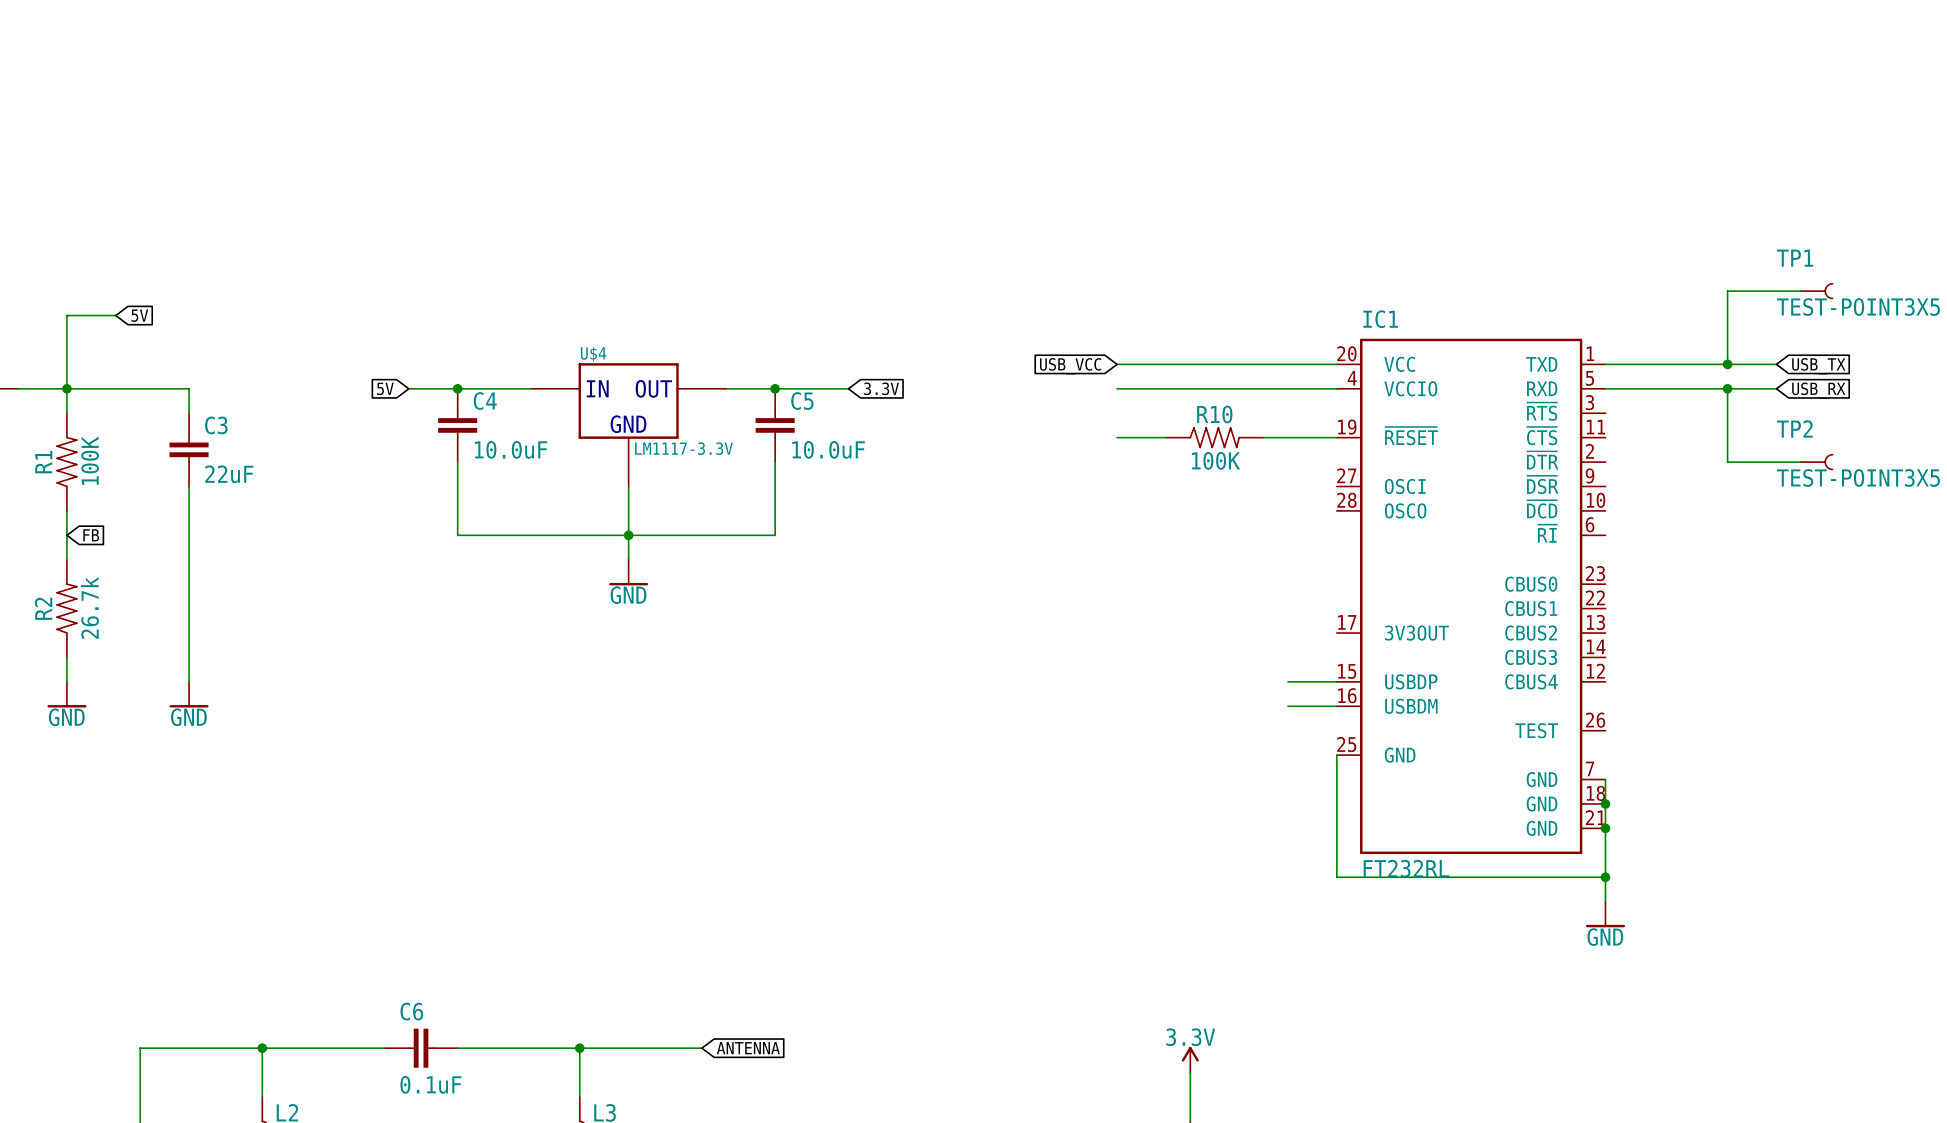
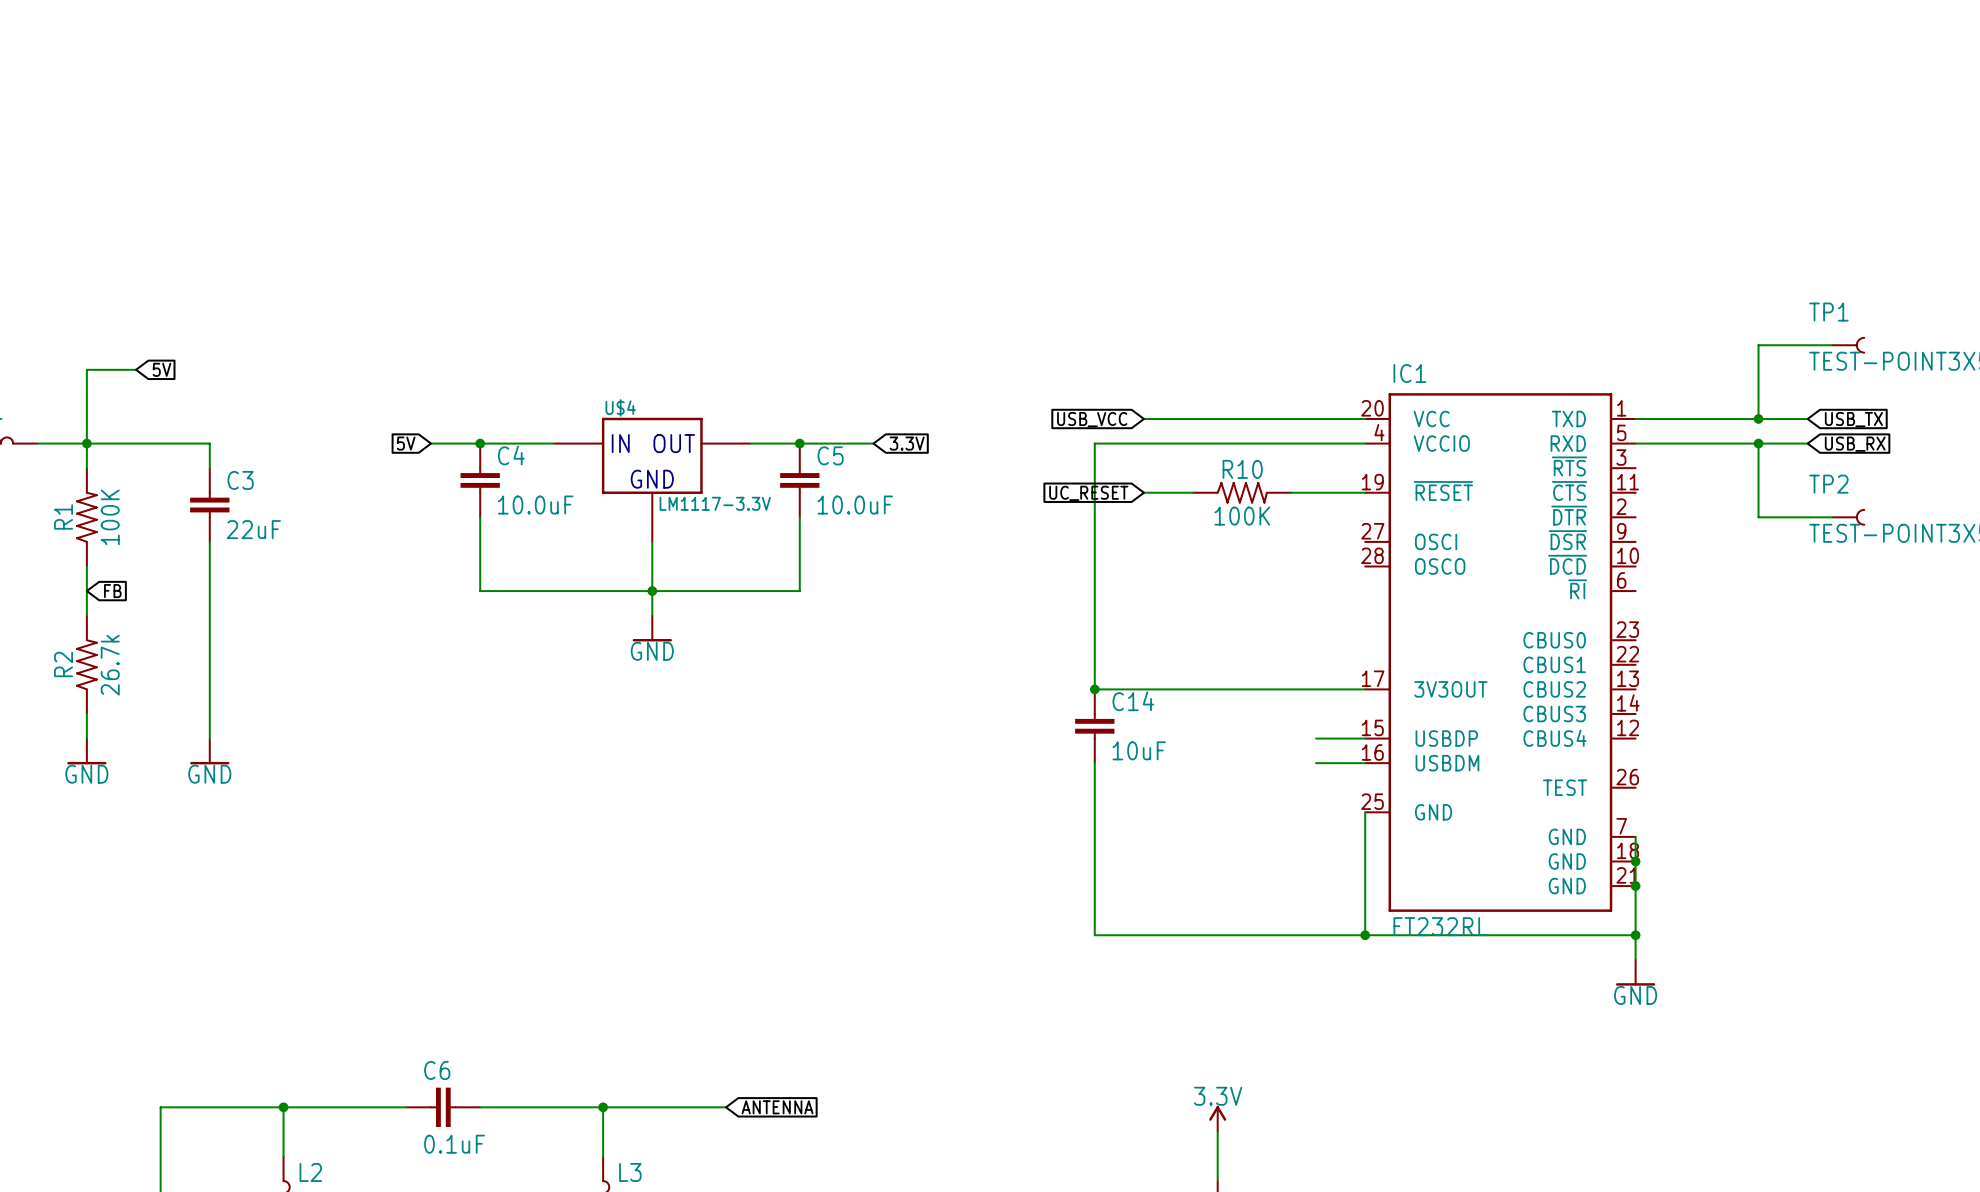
wire: none -> (1143, 443) (1094, 443) (1094, 689) (1365, 689)
global label: none -> UC_RESET (1088, 493)
junction: none -> (1094, 689)
C14: none -> 10uF (1094, 726)
wire: none -> (1094, 763) (1094, 935) (1365, 935)
junction: none -> (1365, 935)

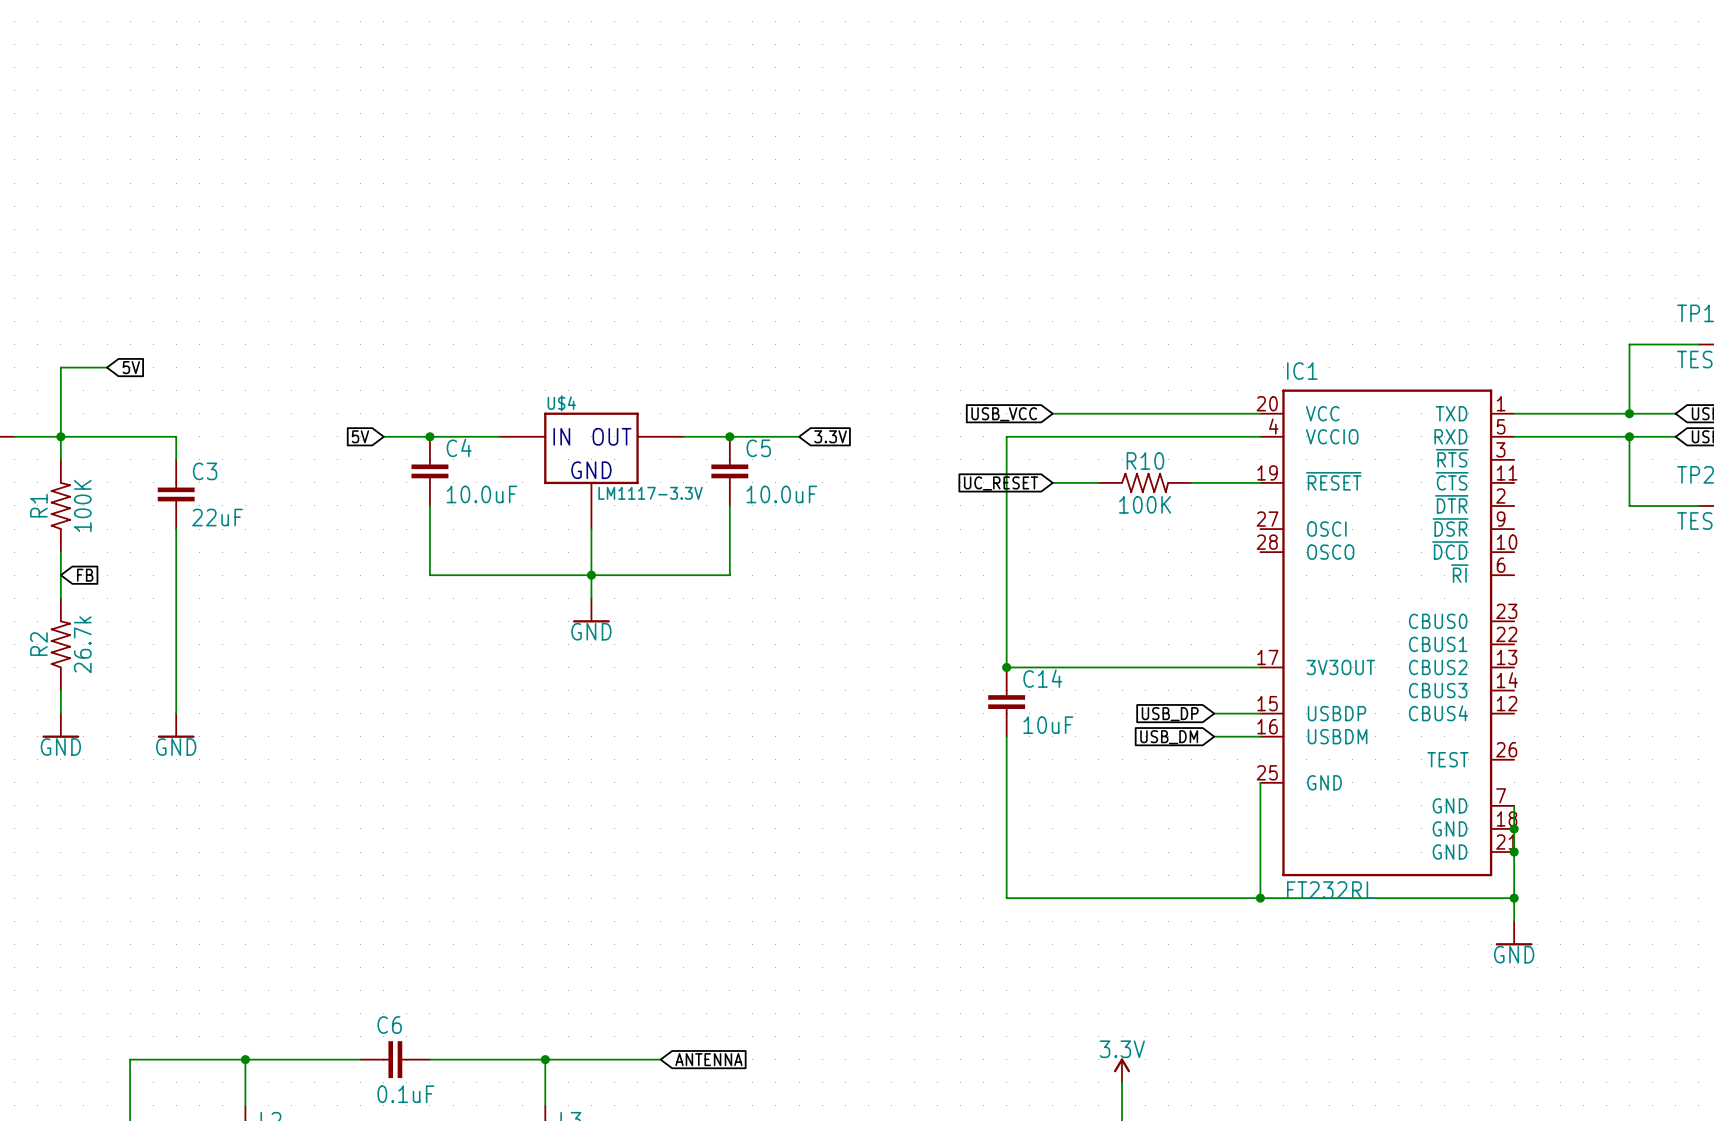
global label: none -> USB_DP (1170, 714)
global label: none -> USB_DM (1169, 737)

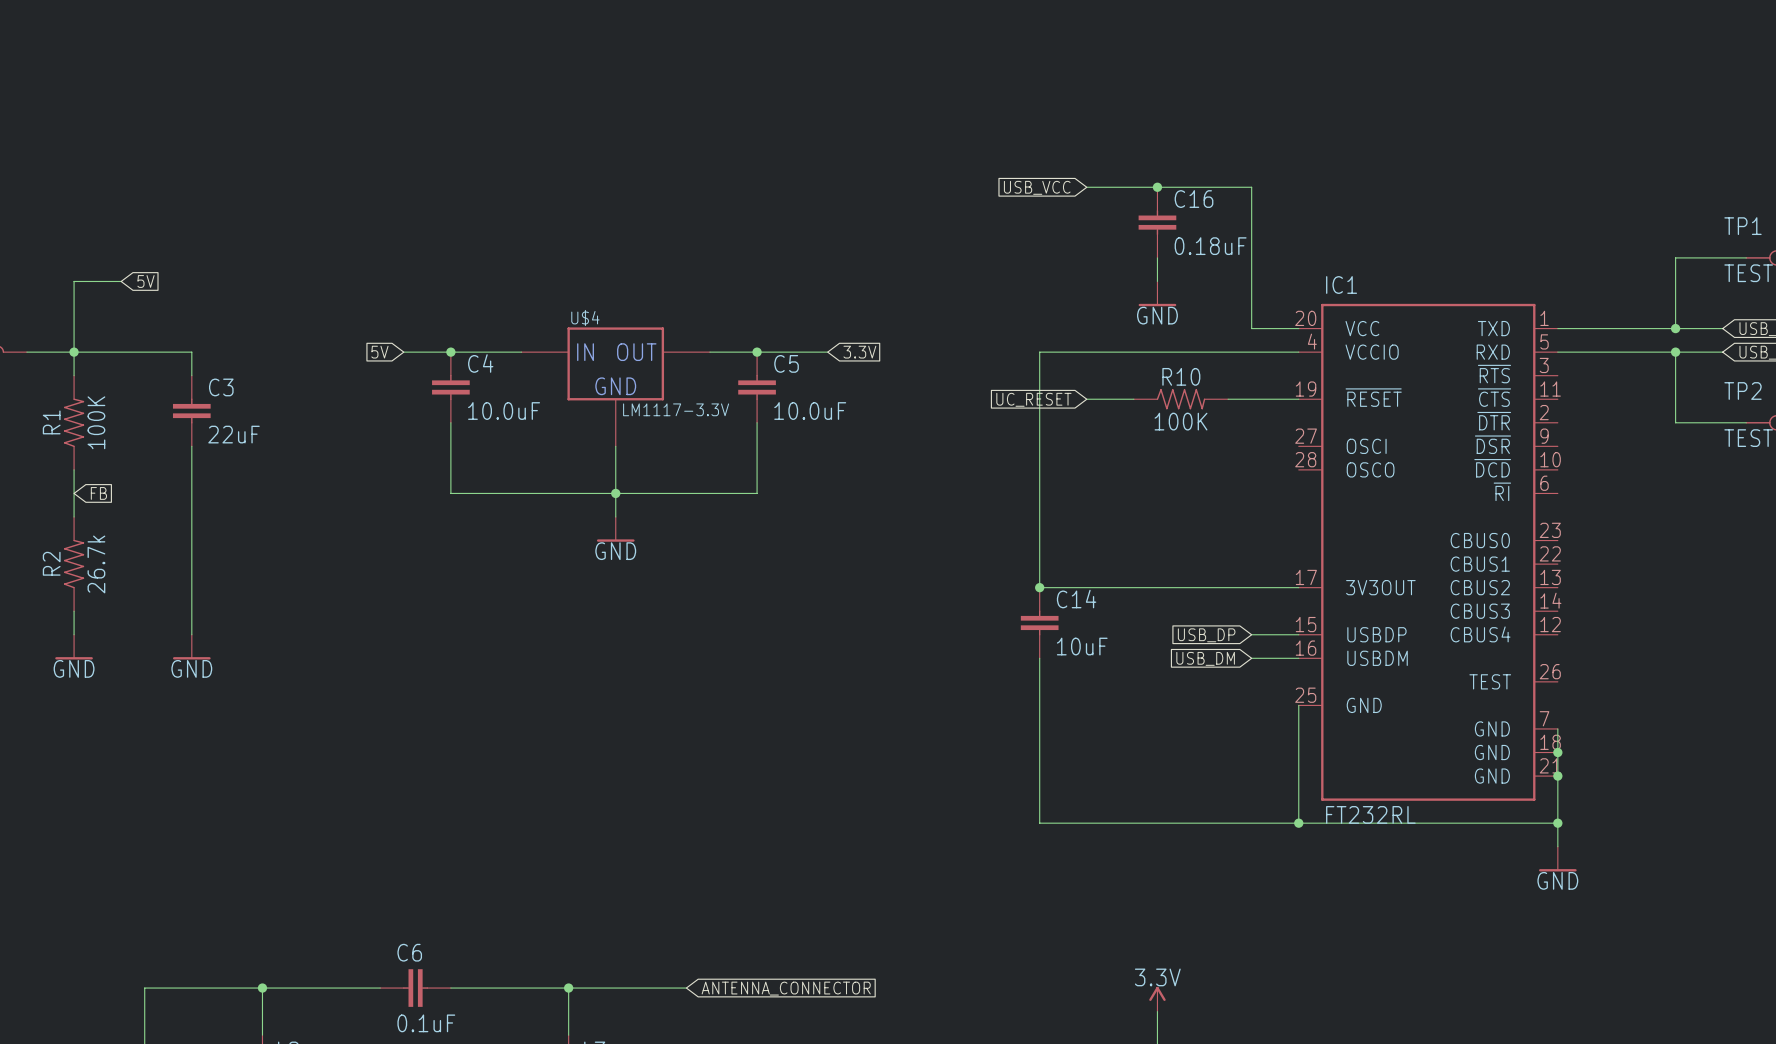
junction: none -> (1157, 187)
C16: none -> 0.18uF (1157, 222)
wire: none -> (1157, 257) (1157, 281)
power symbol: none -> GND (1157, 293)
wire: (1052, 413) (1214, 413) -> (1086, 187) (1251, 187) (1251, 328)
global label position: USB_VCC (1004, 414) -> USB_VCC (1037, 187)
global label: ANTENNA (708, 1059) -> ANTENNA_CONNECTOR (786, 988)

